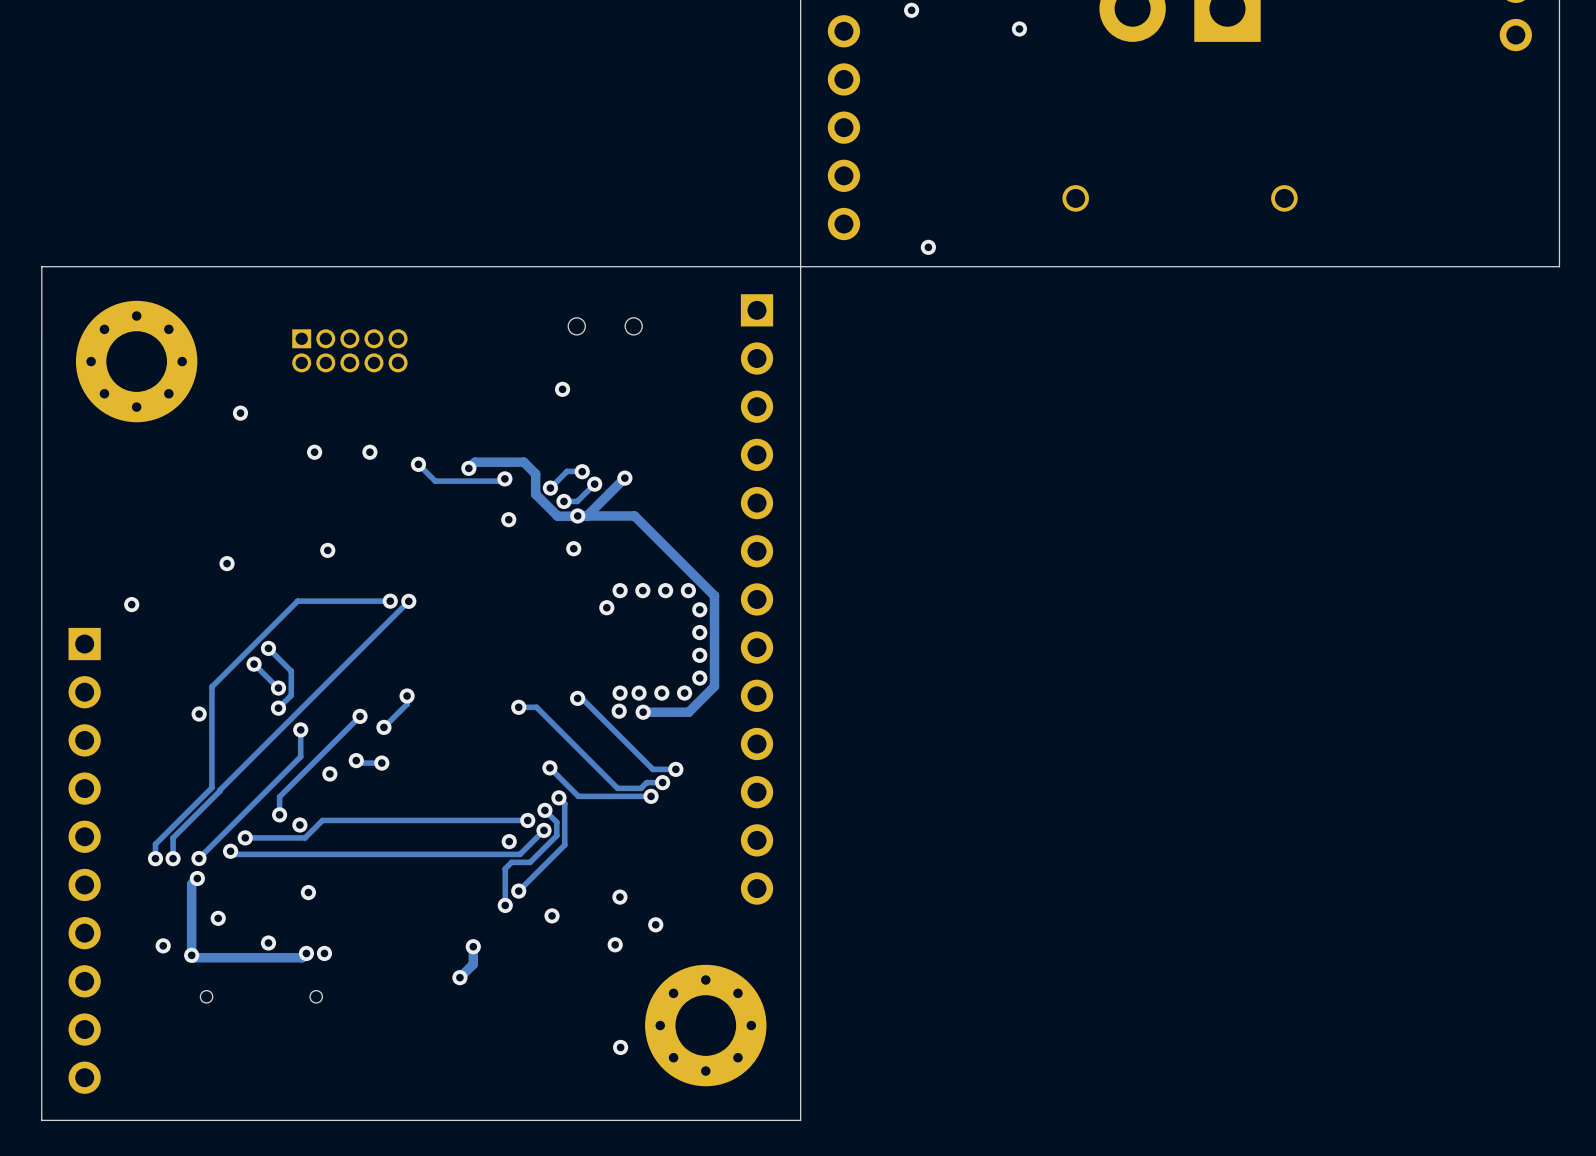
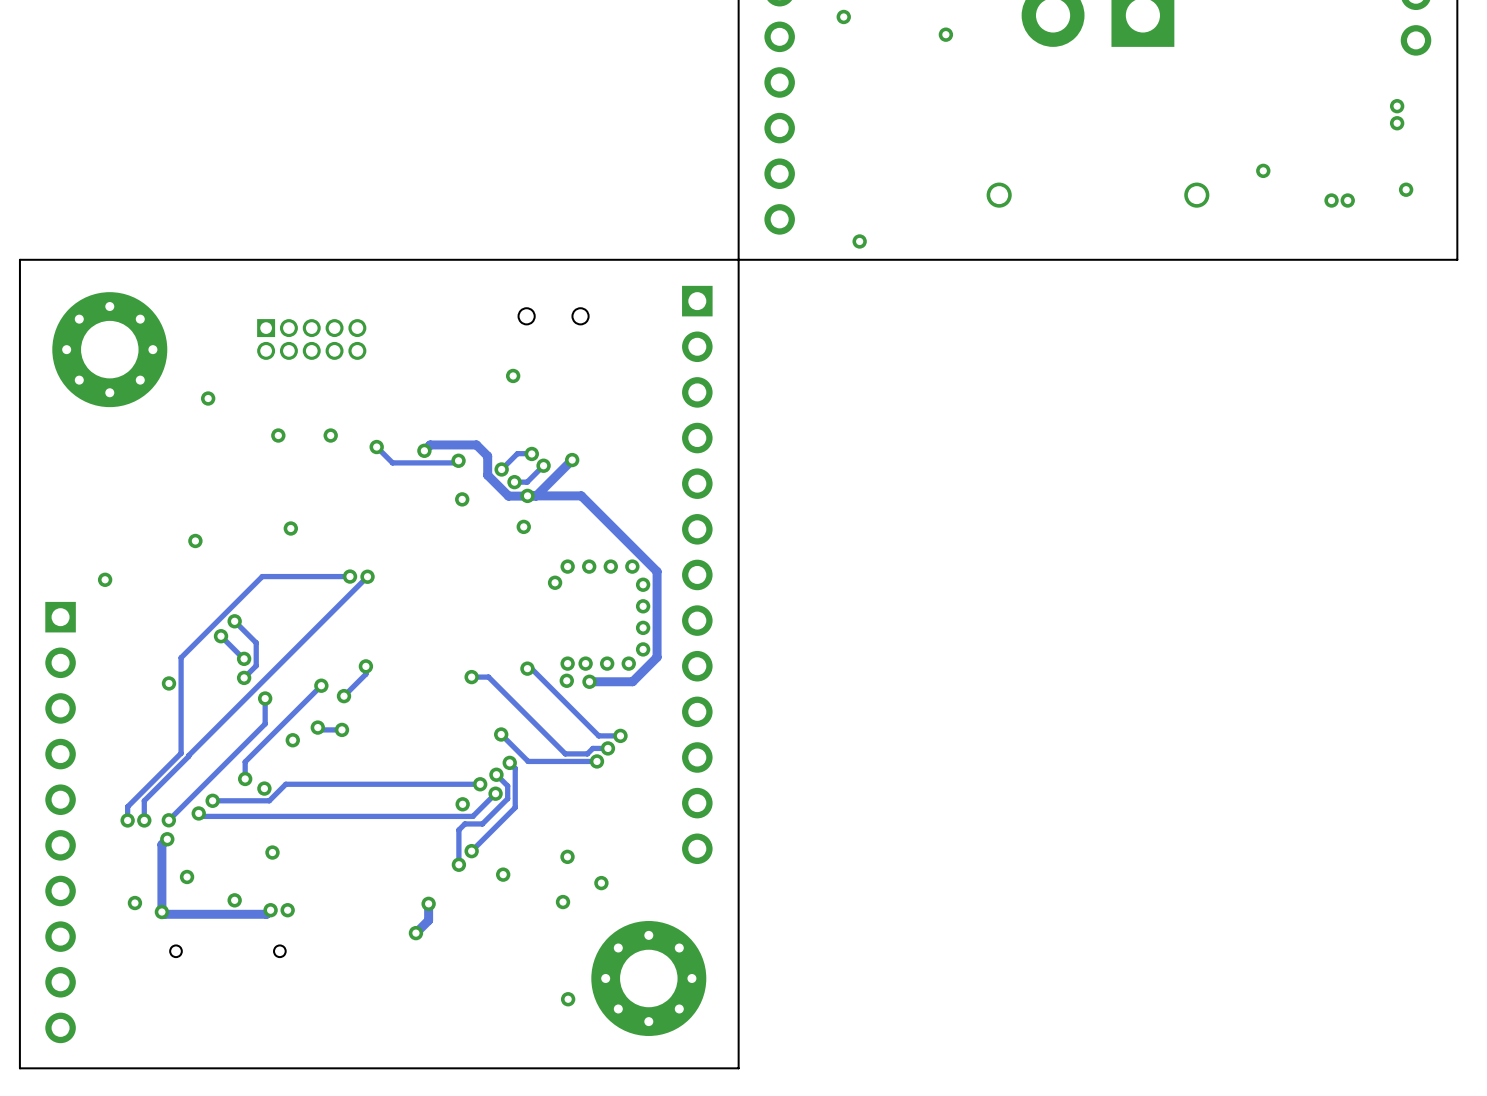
via: none -> (1397, 106)
via: none -> (1397, 123)
via: none -> (1263, 170)
via: none -> (1406, 189)
via: none -> (1331, 200)
via: none -> (1347, 200)

